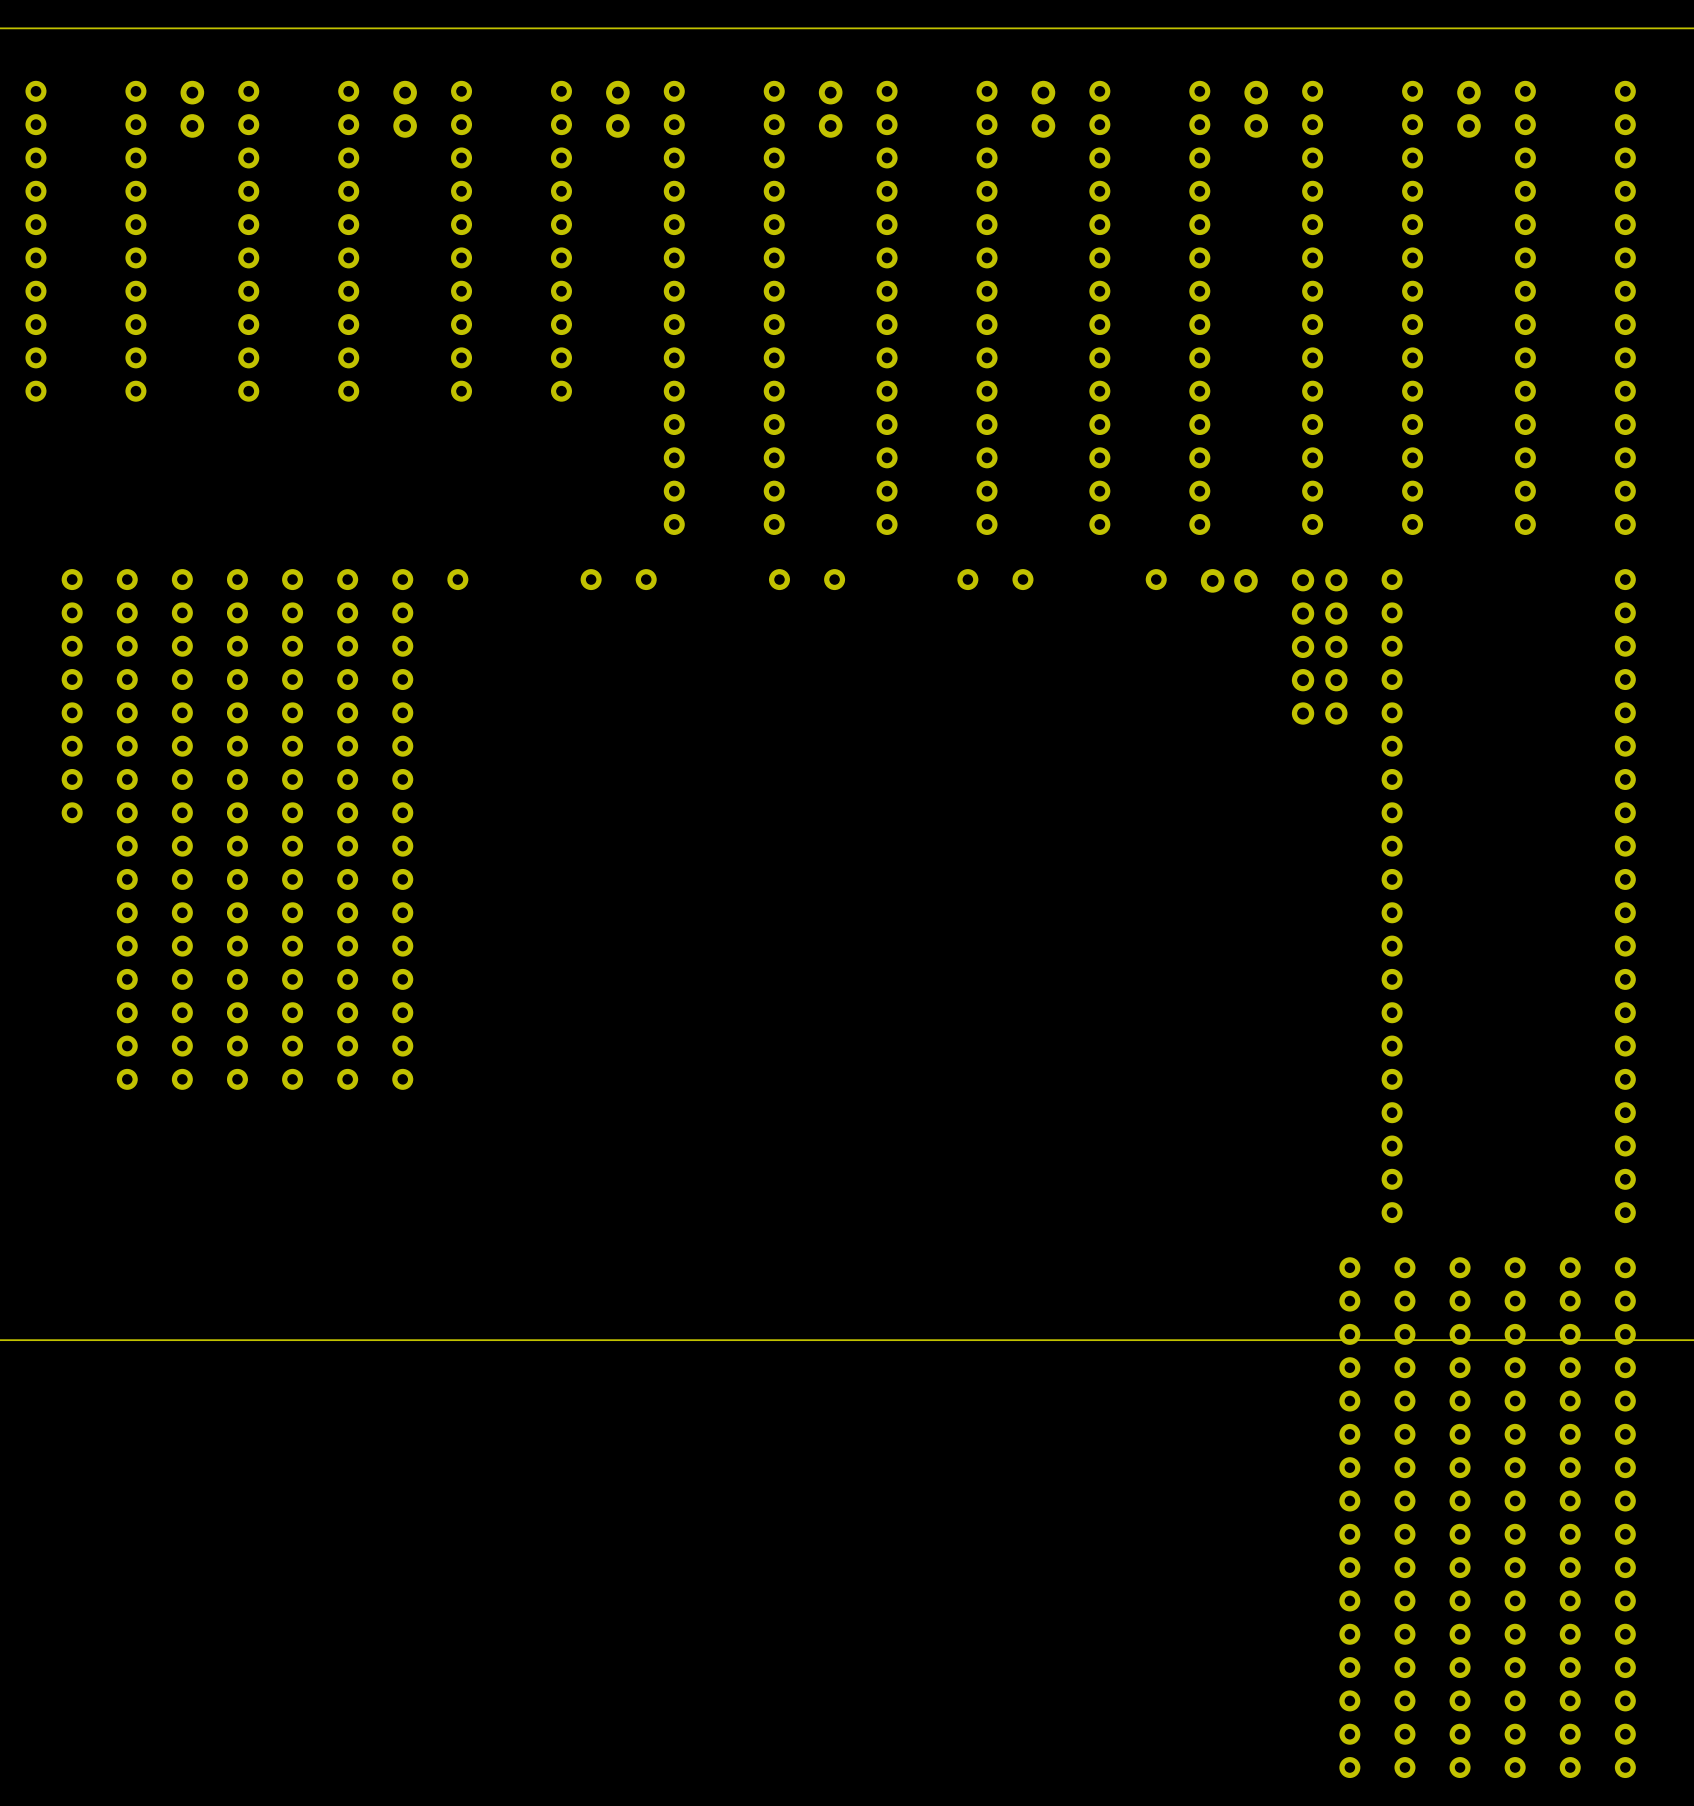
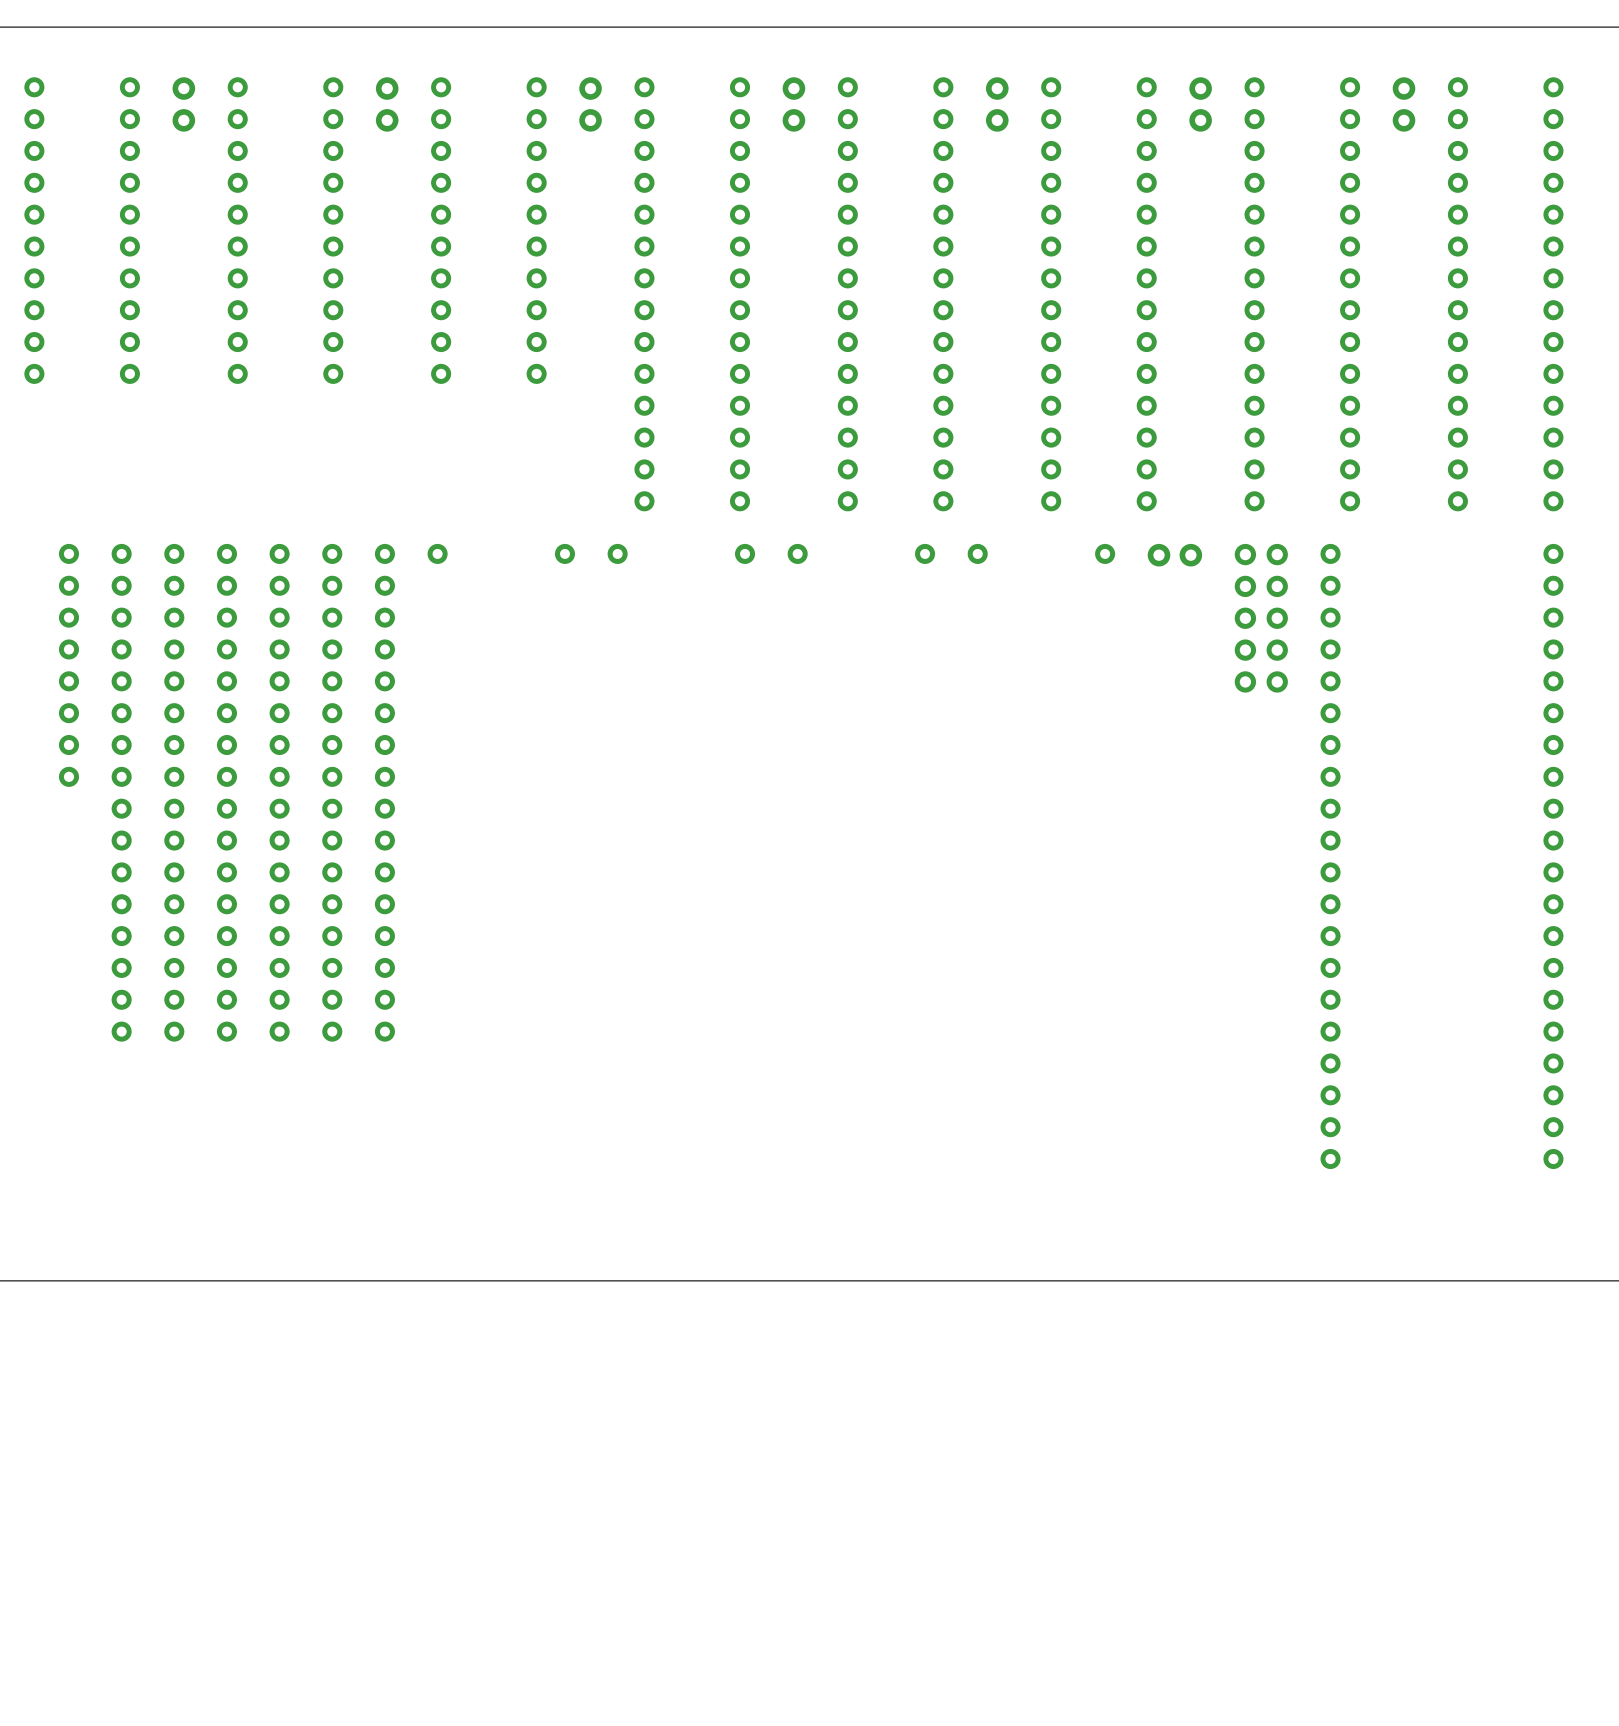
part: (1349, 1517) -> none
part: (1404, 1517) -> none
part: (1460, 1517) -> none
part: (1515, 1517) -> none
part: (1570, 1517) -> none
part: (1625, 1517) -> none

